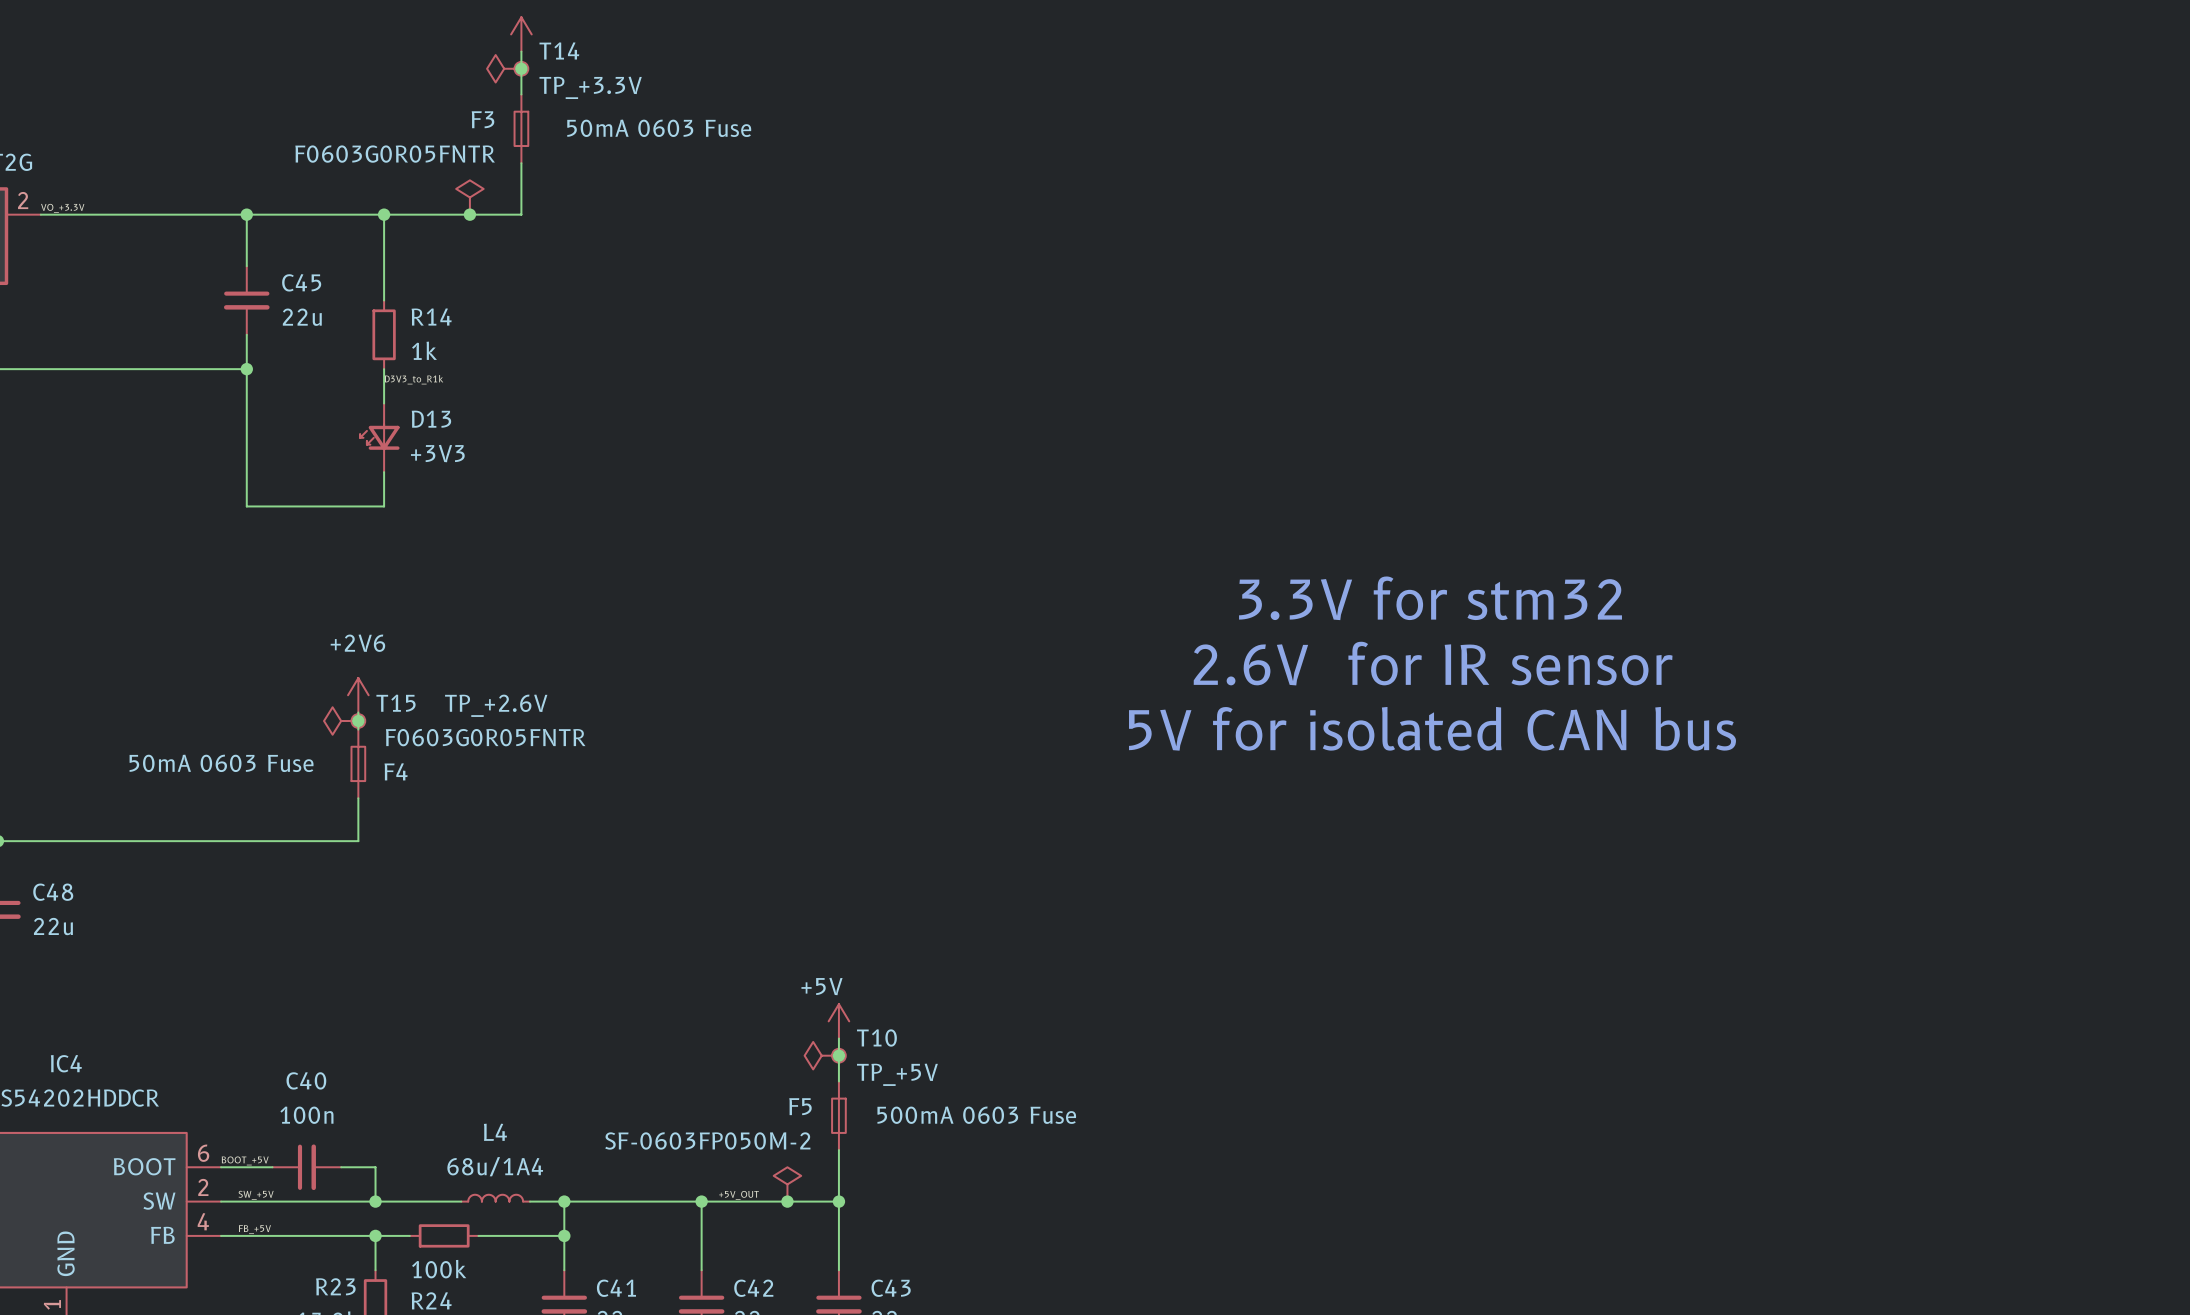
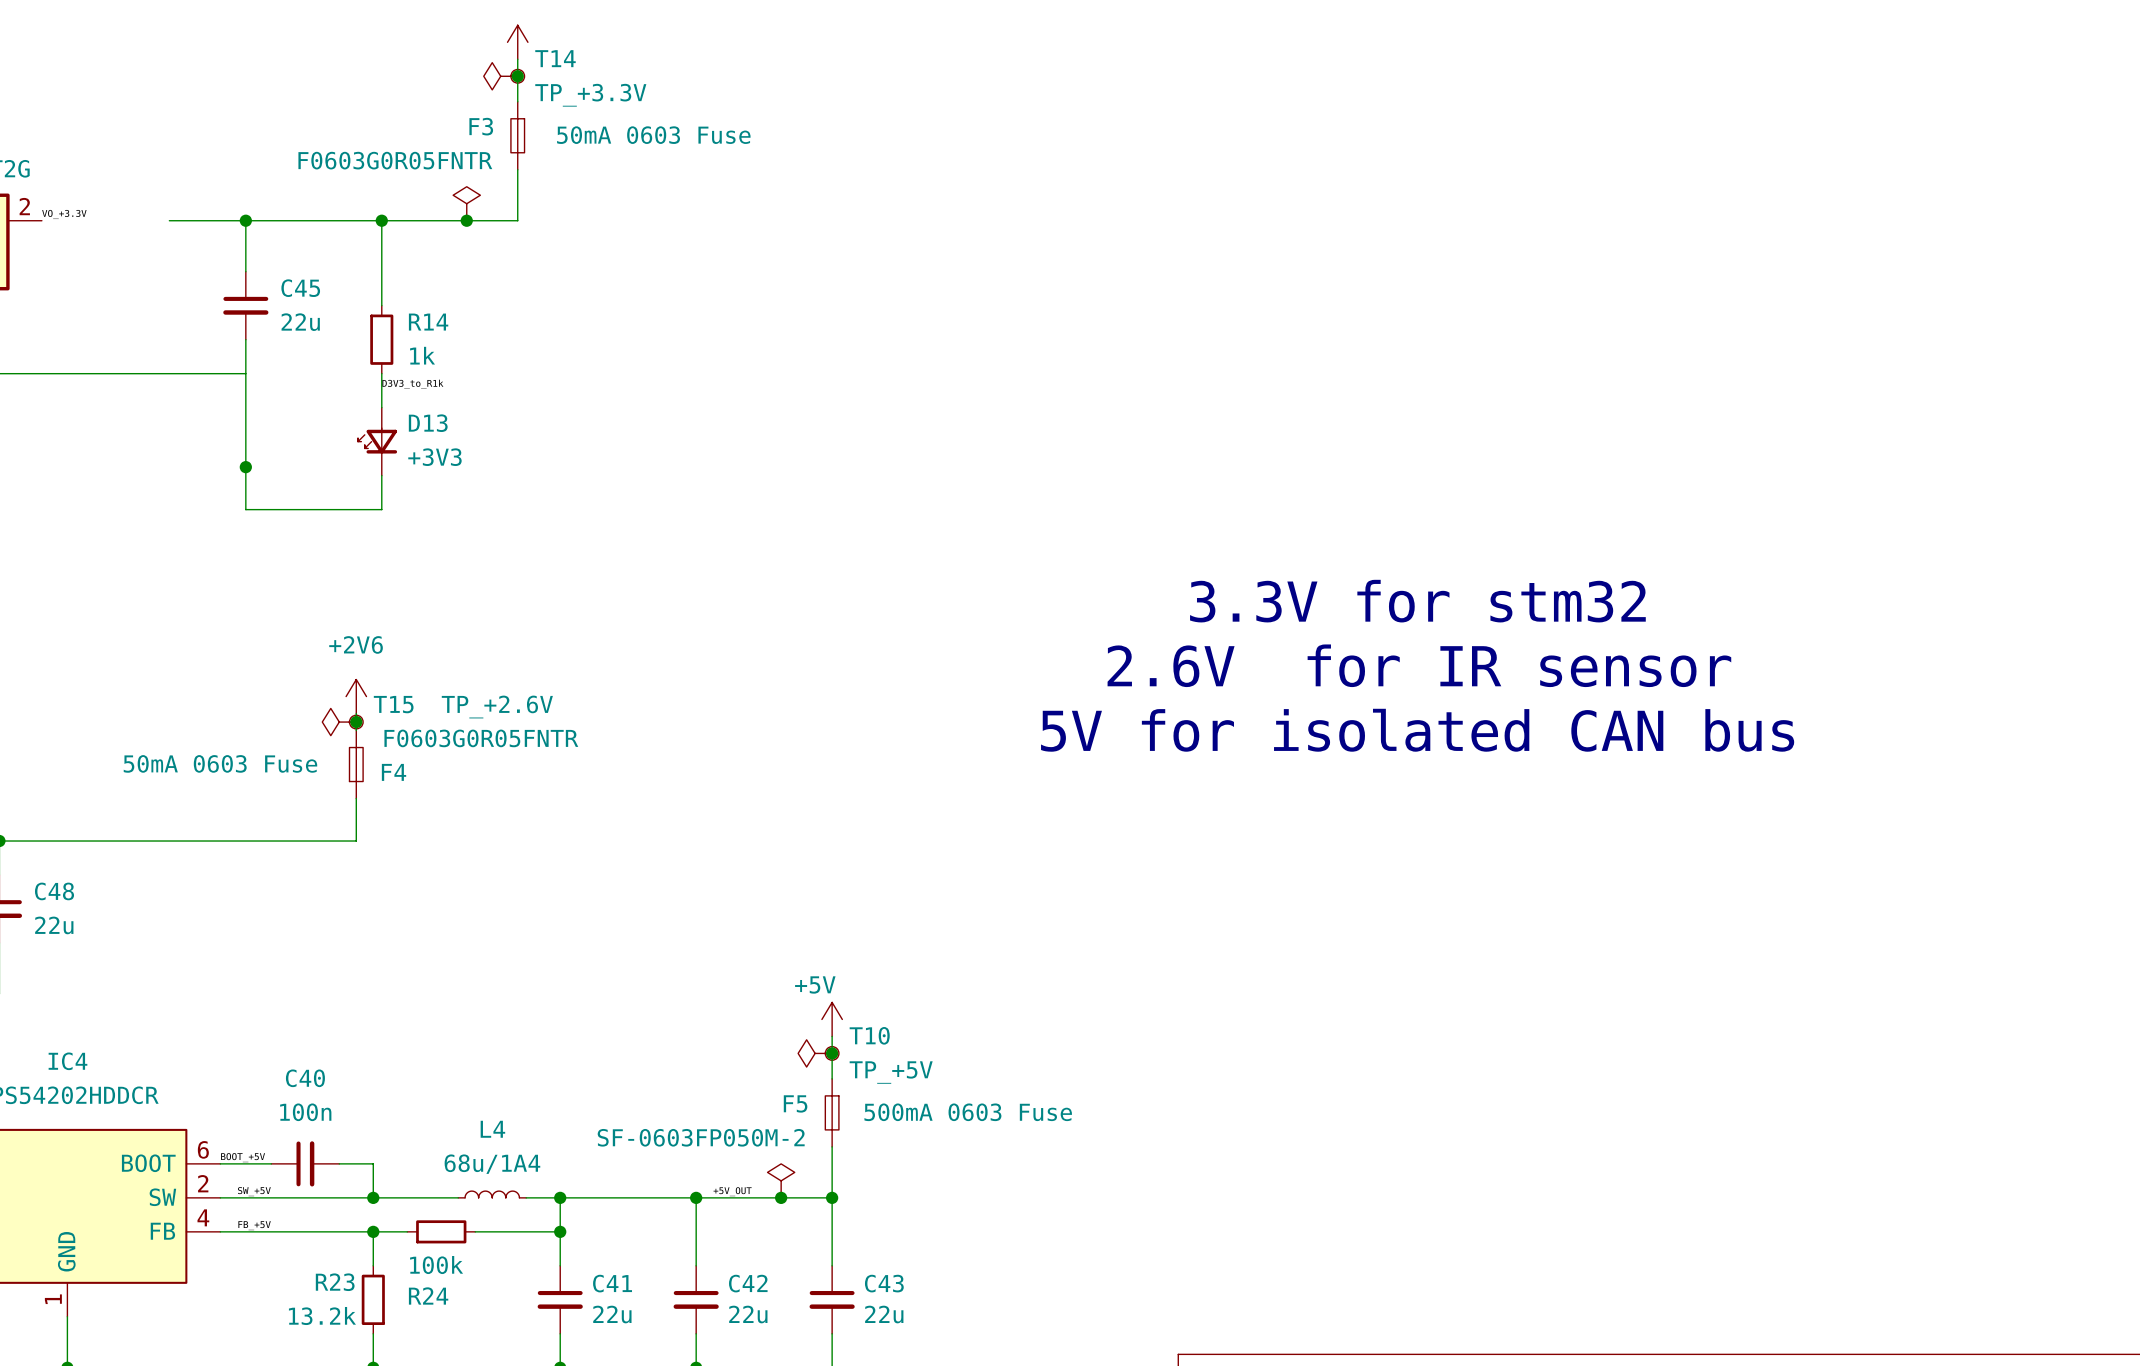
wire: (40, 214) (169, 214) -> none
junction: (246, 369) -> none
junction: none -> (245, 467)

